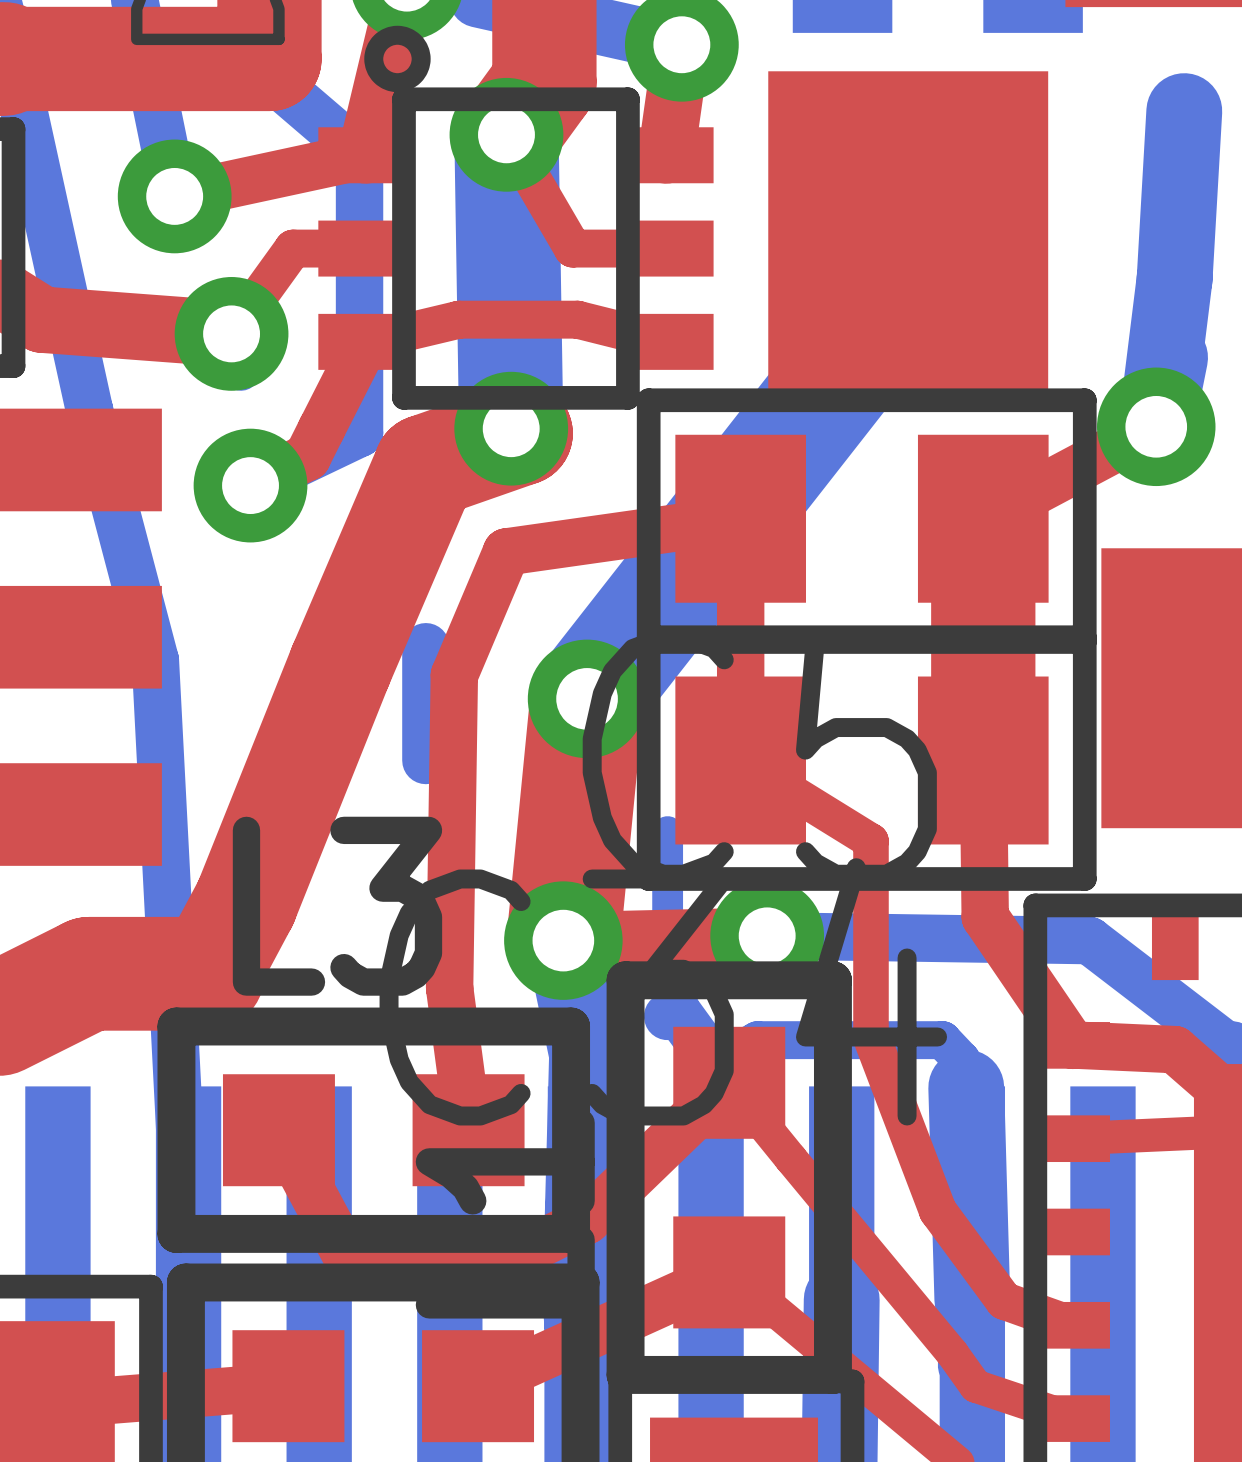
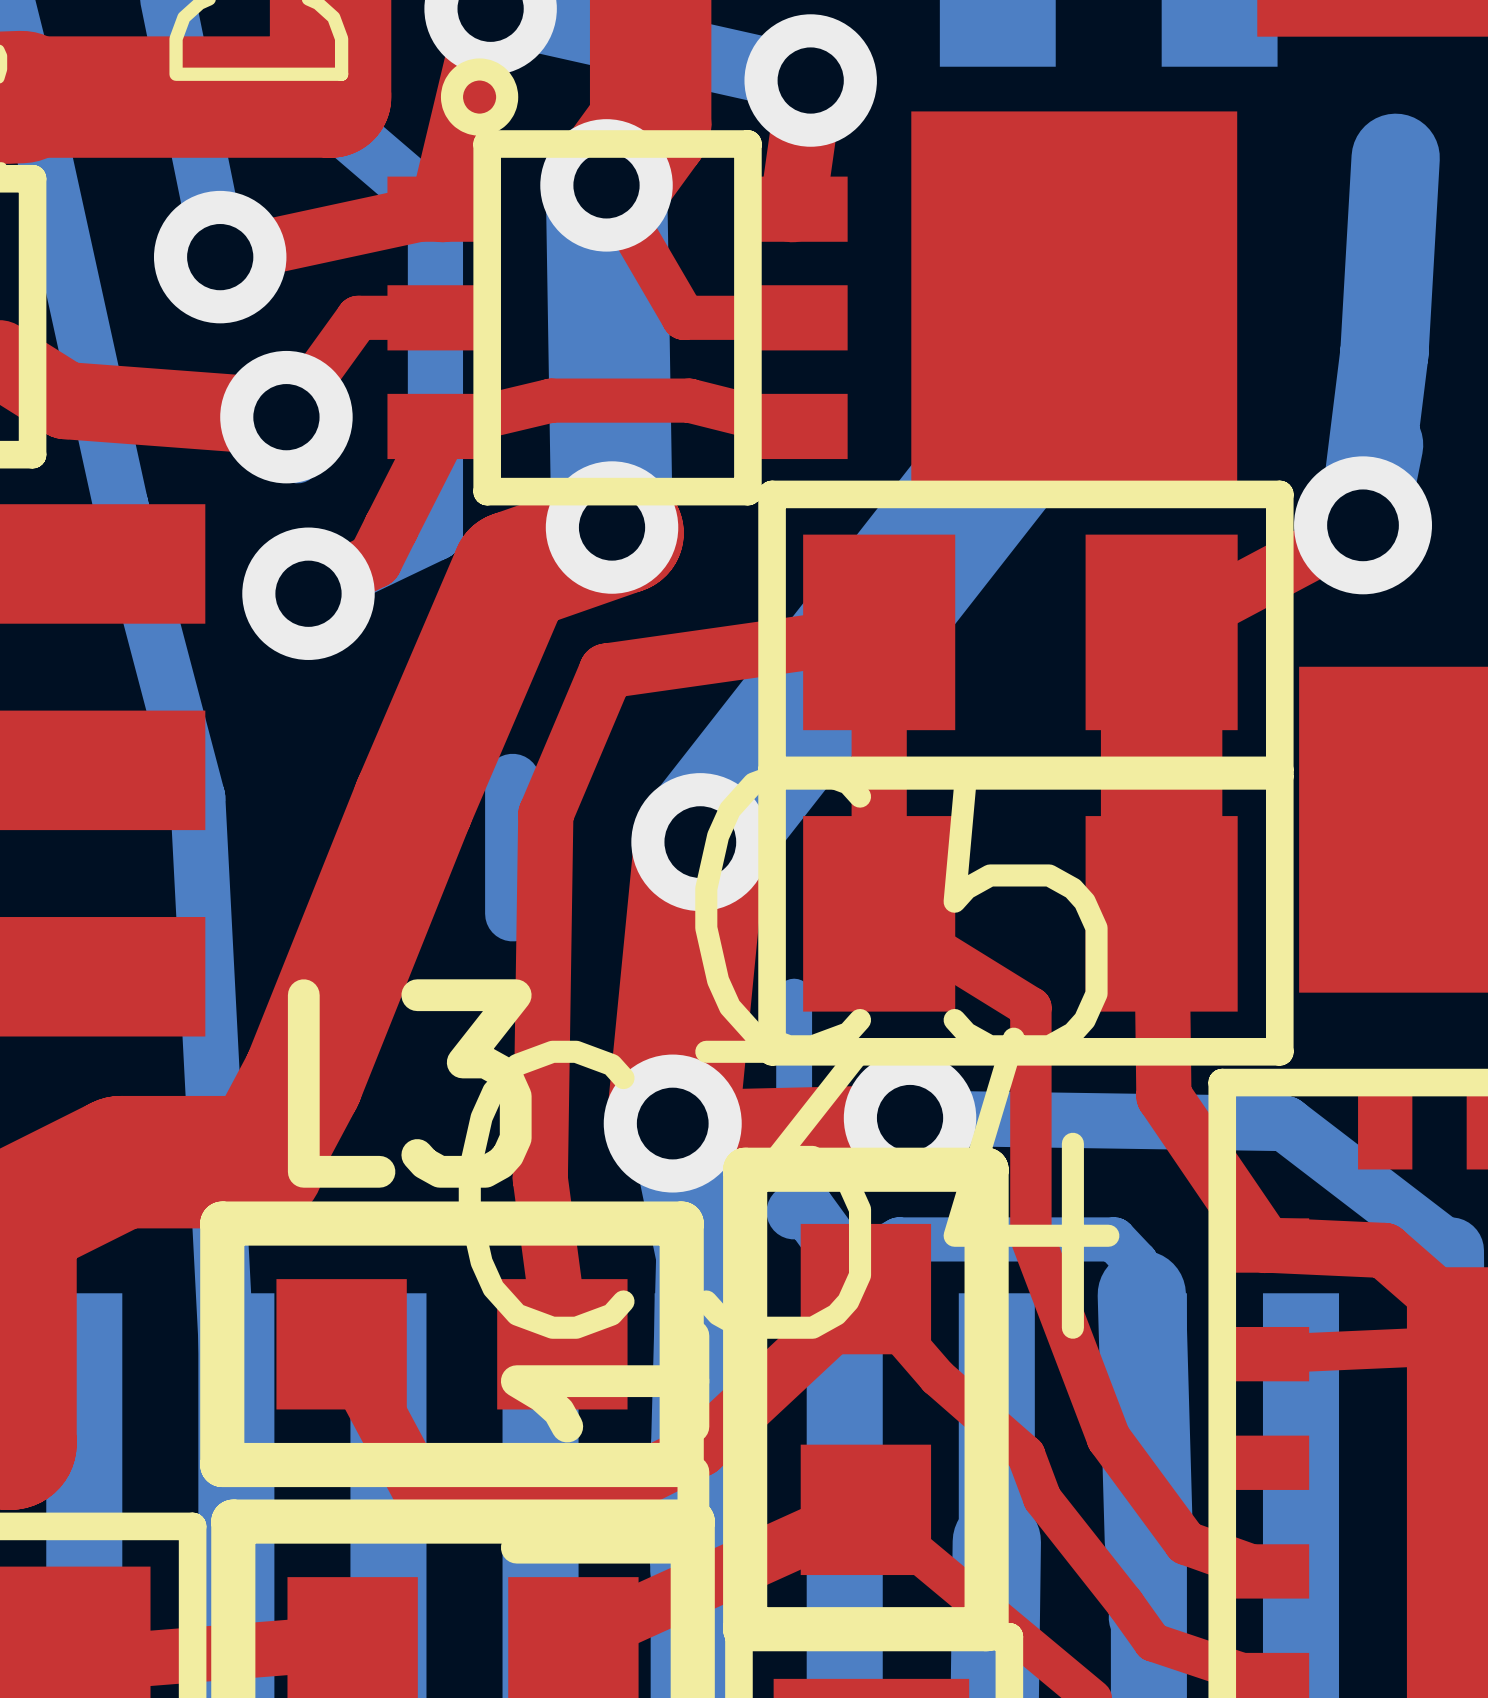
top track: (587, 1220) (729, 1082) (952, 1352) -> (700, 1449) (865, 1294) (937, 1377) (1025, 1454) (1042, 1498) (1125, 1603)

